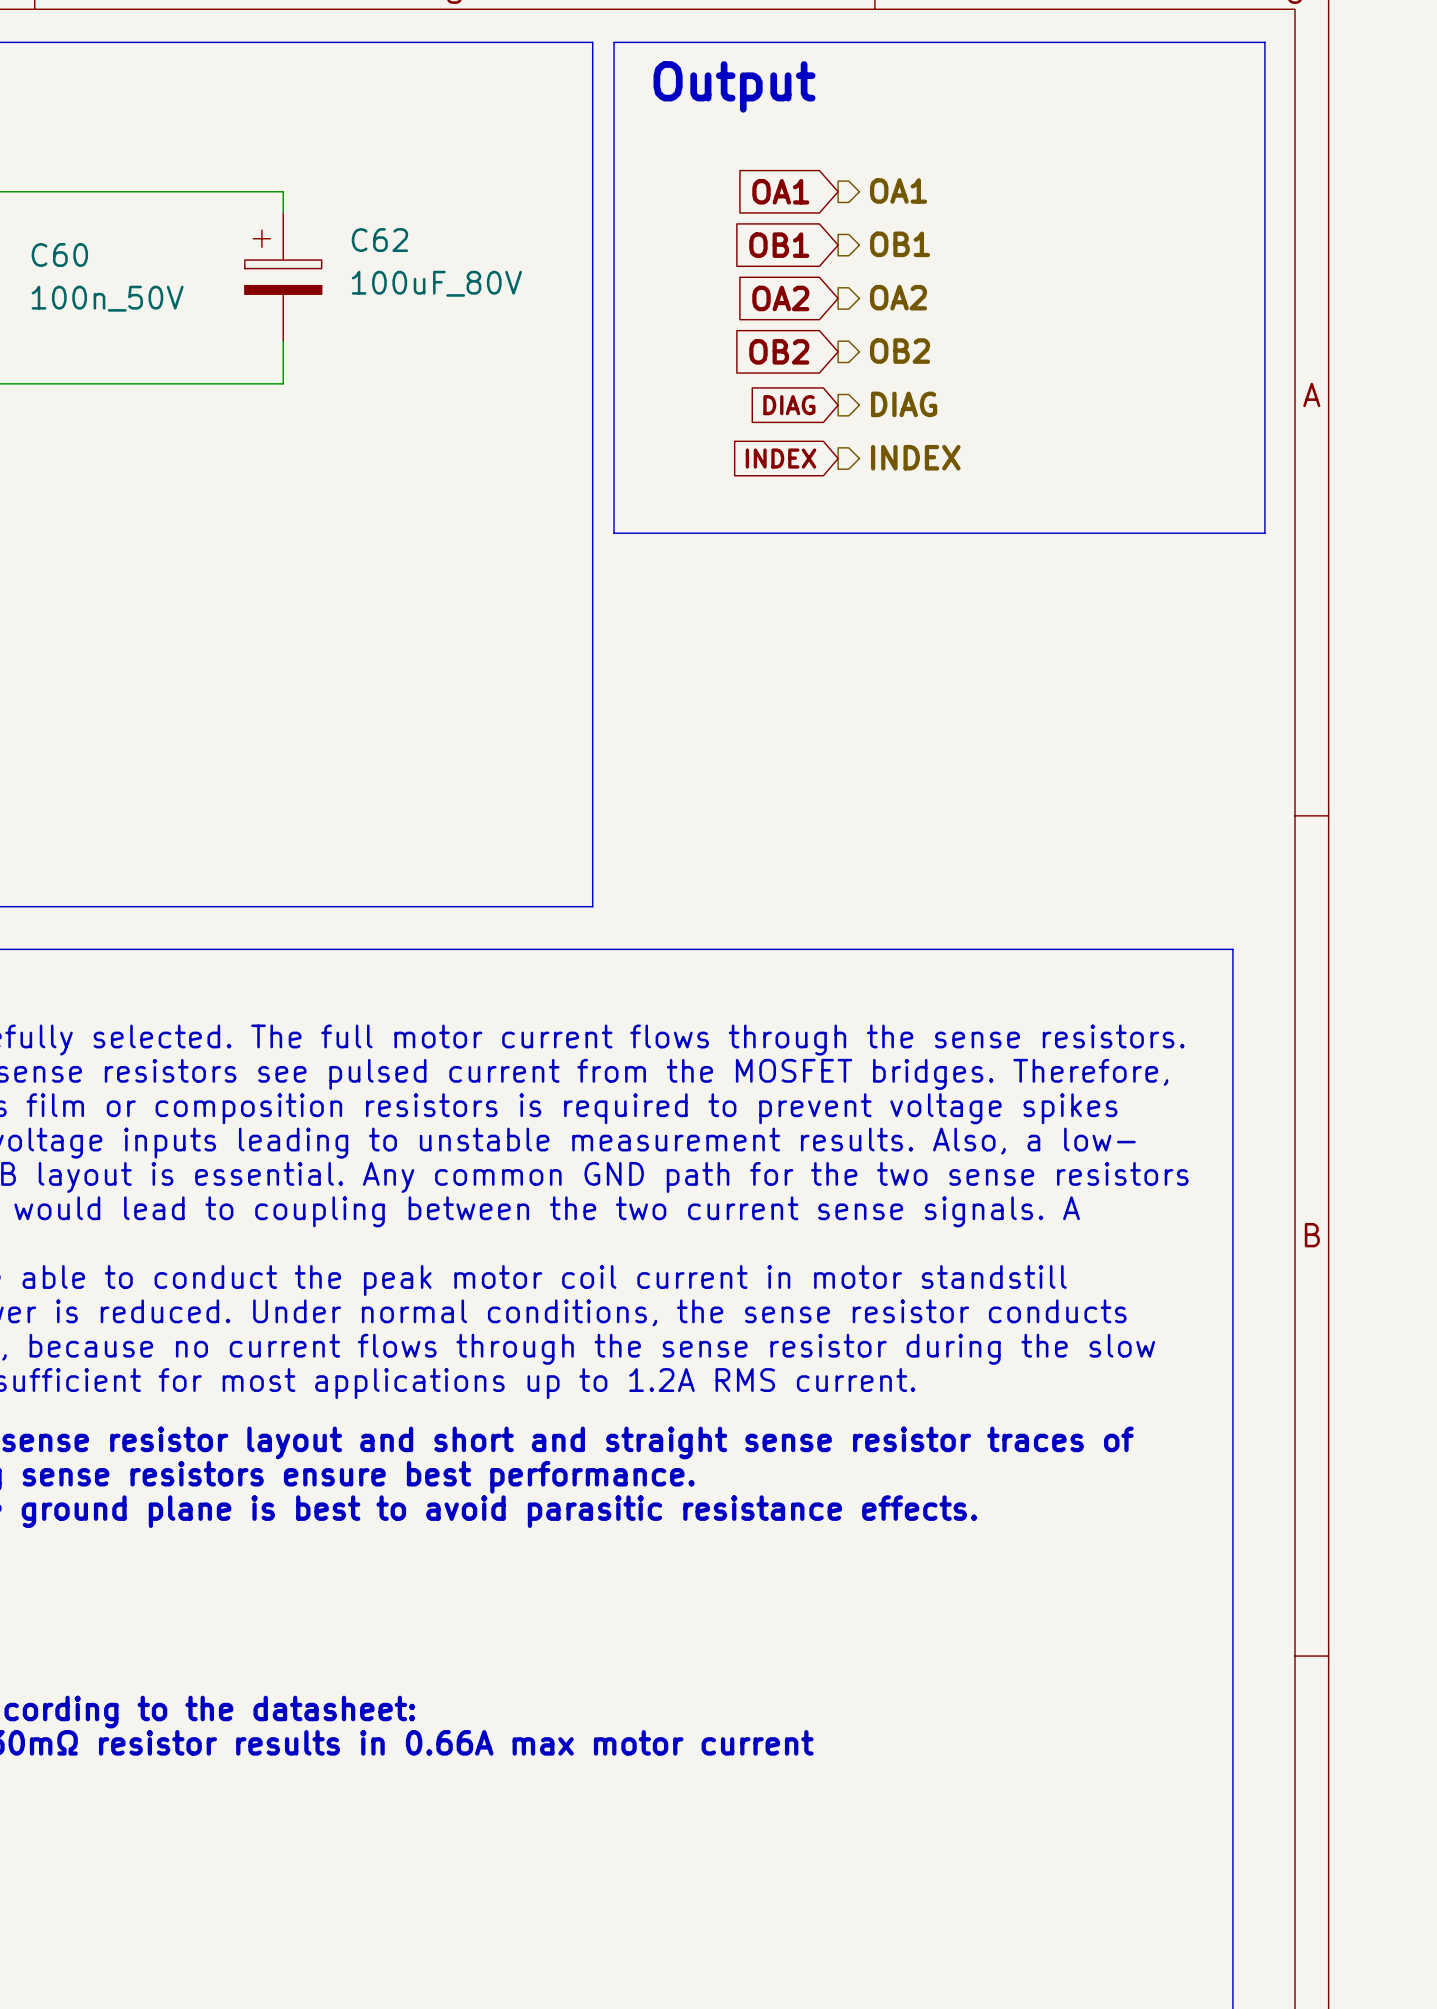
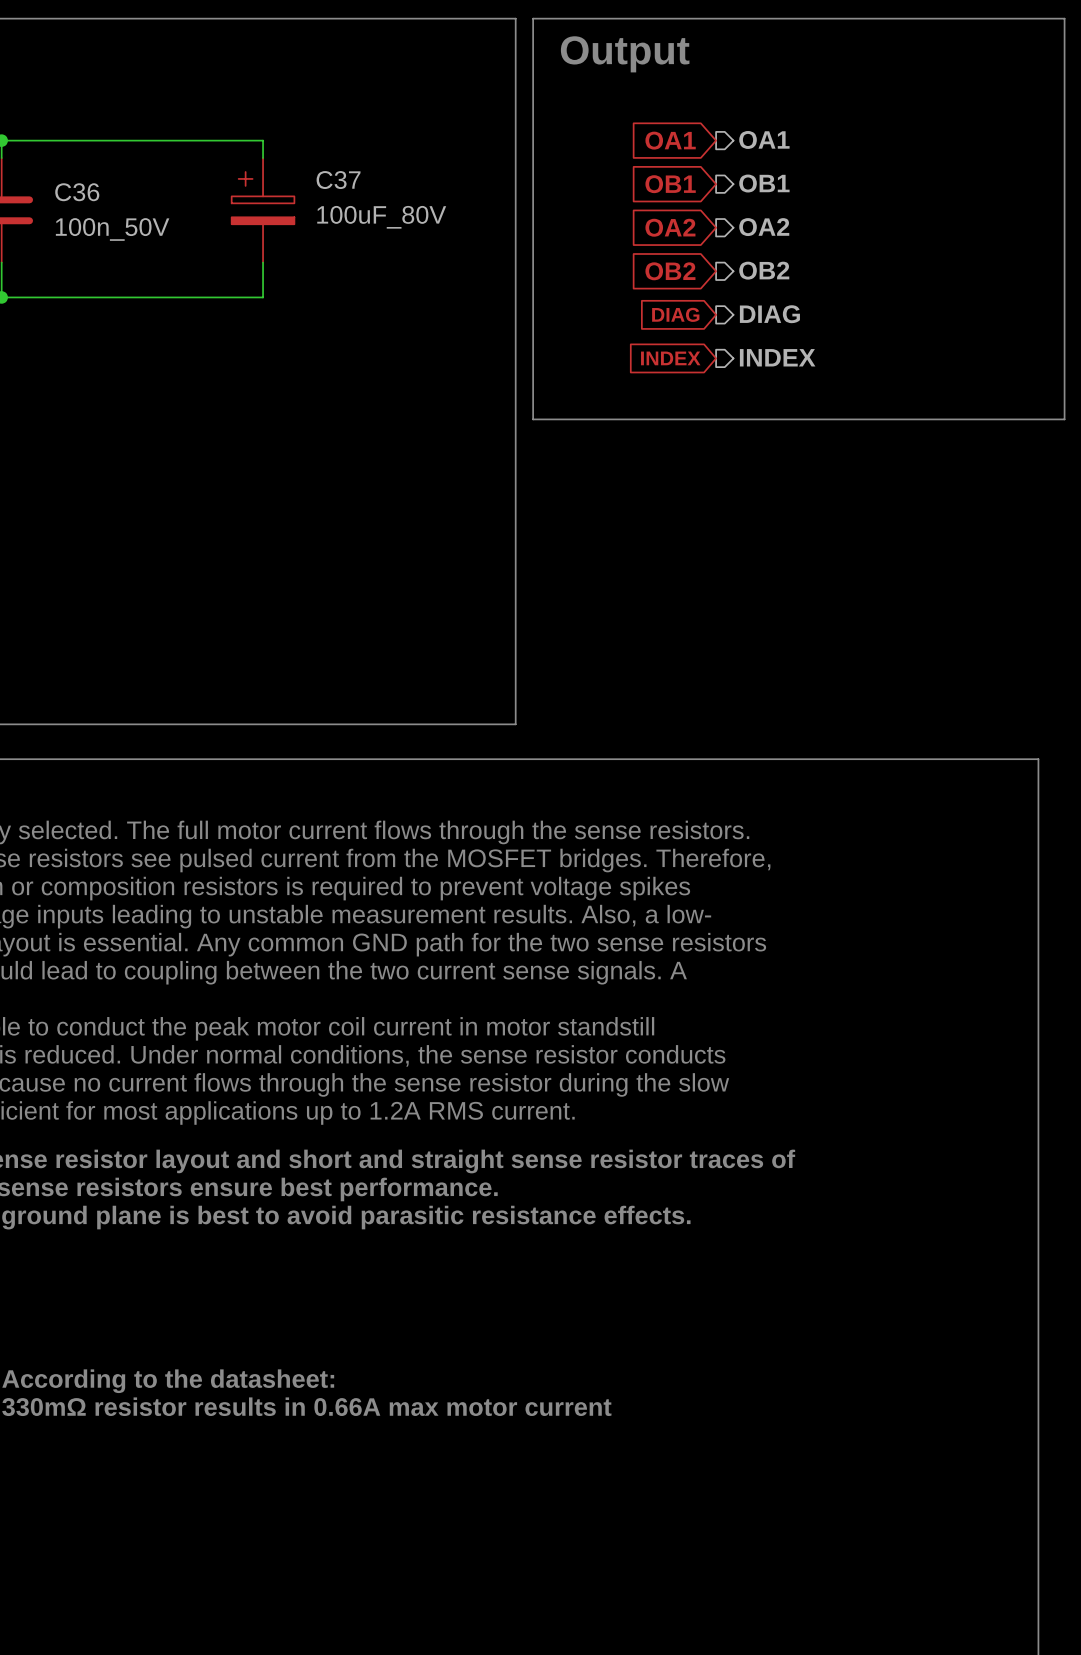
C62 name: C62 (379, 240) -> C37 (338, 180)
C60 name: C60 (59, 254) -> C36 (77, 192)

